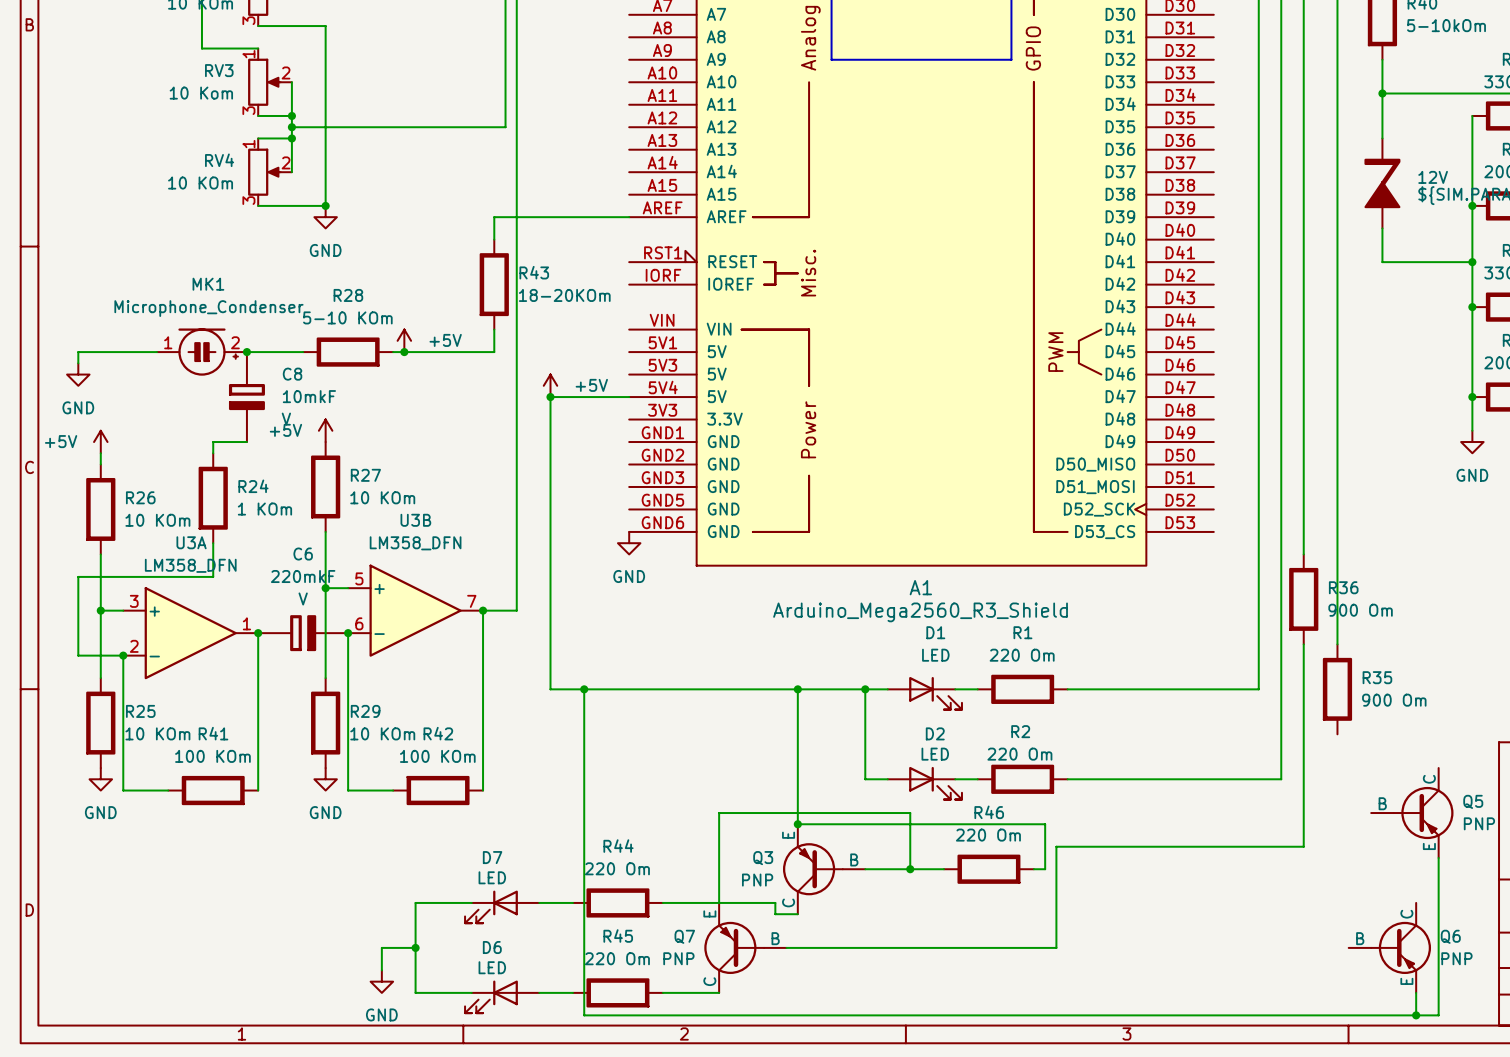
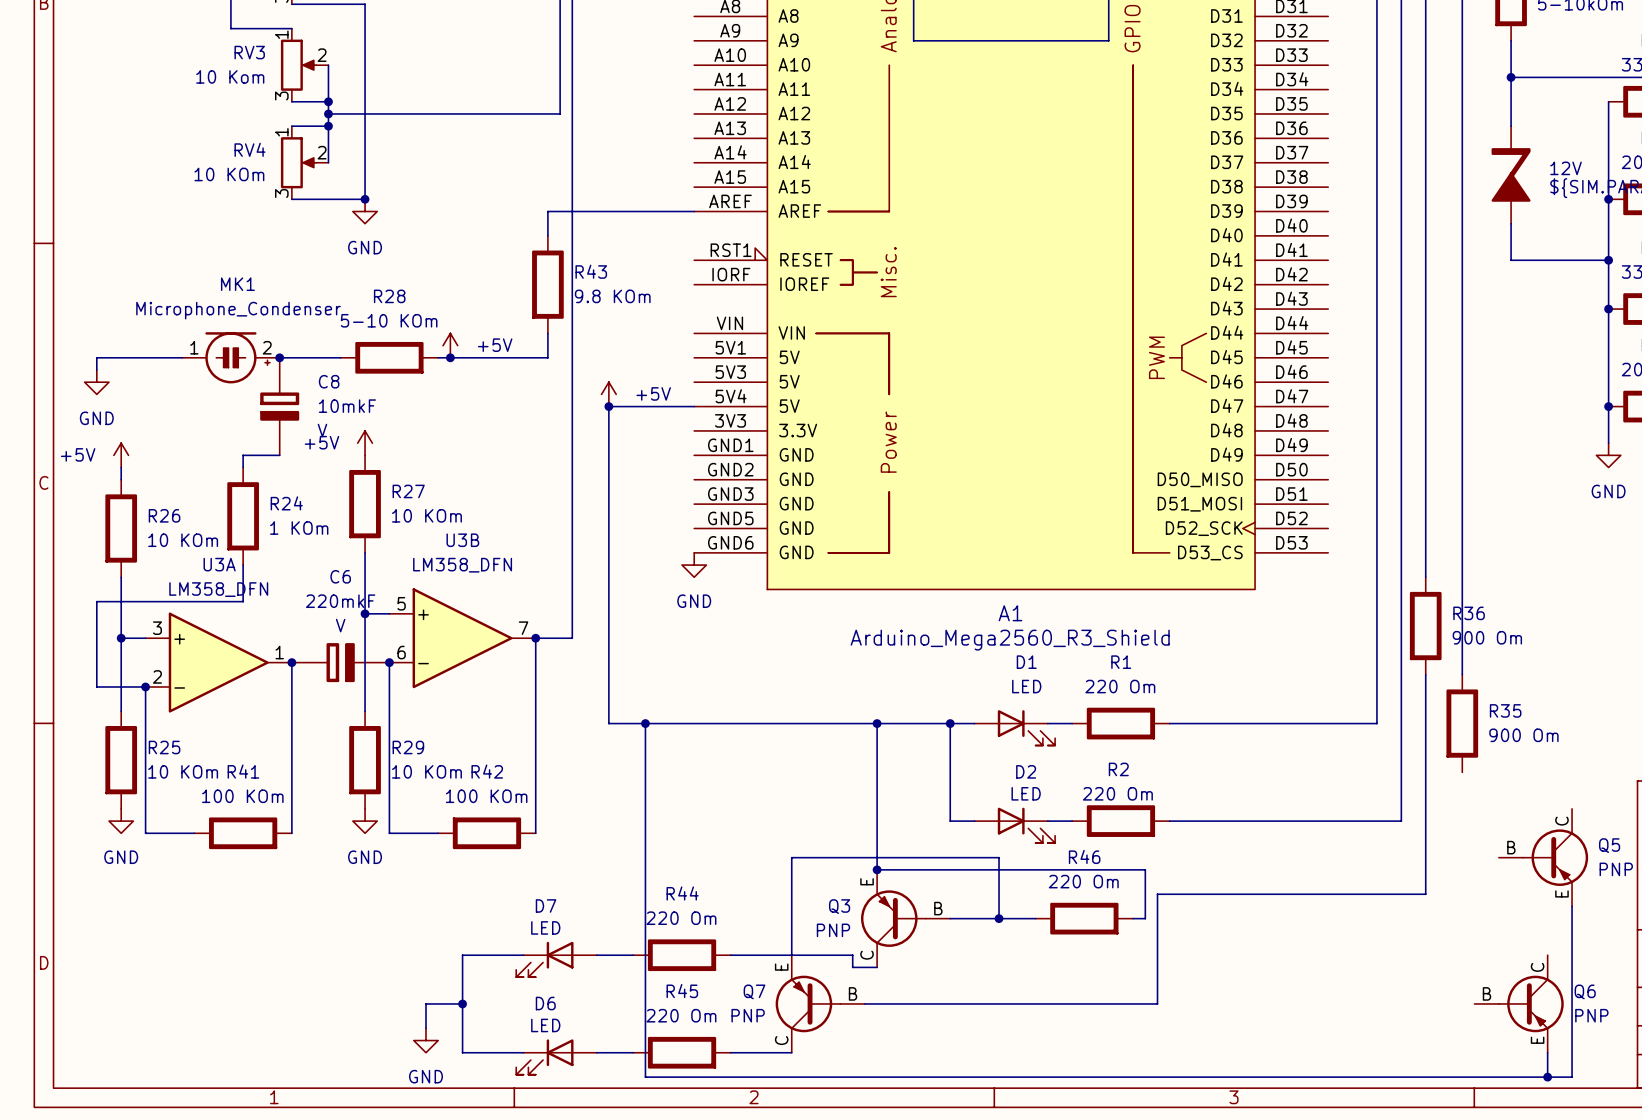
R43 value: 18-20KOm (564, 295) -> 9.8 KOm (612, 296)

